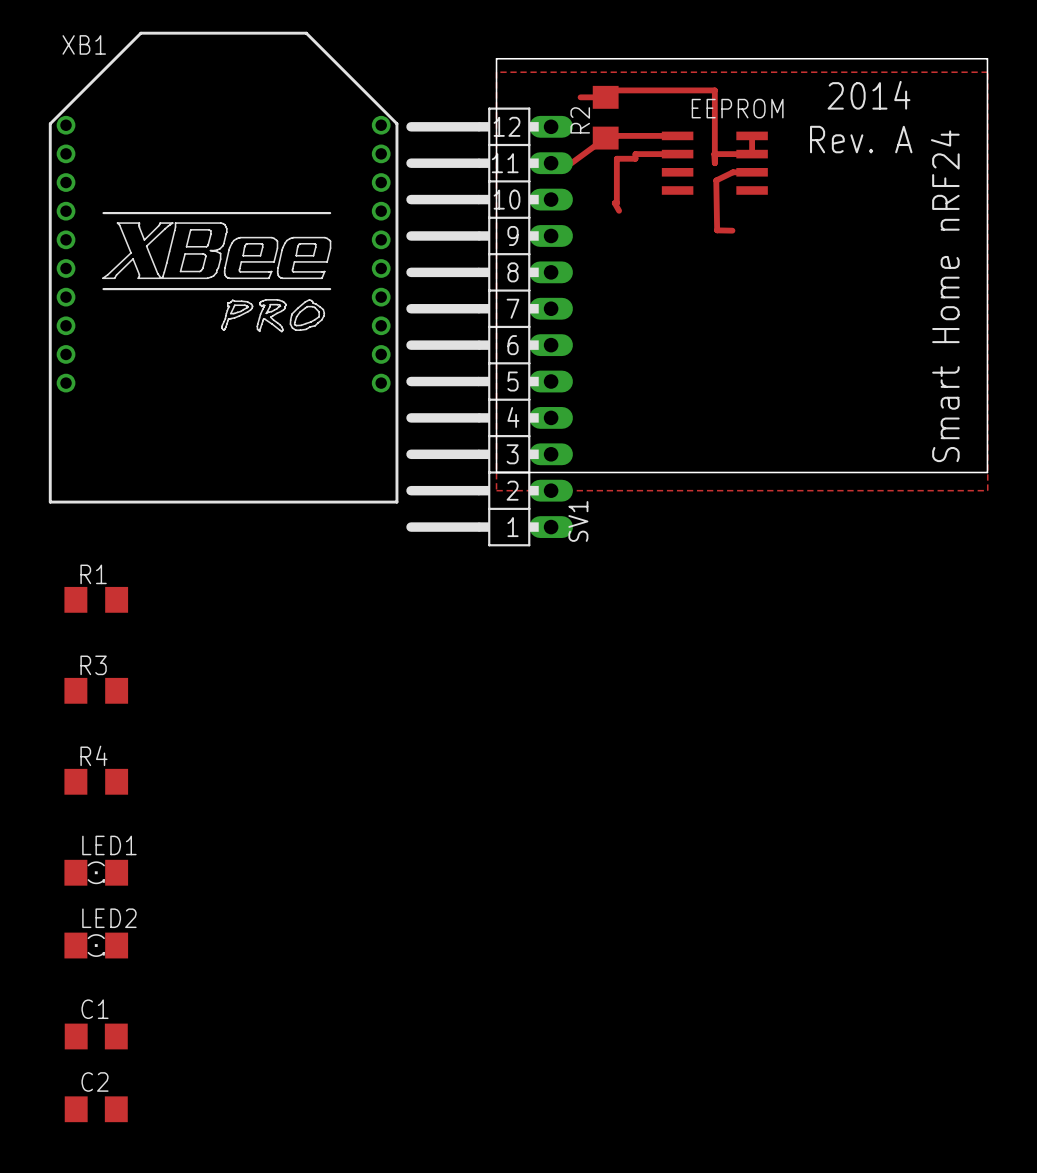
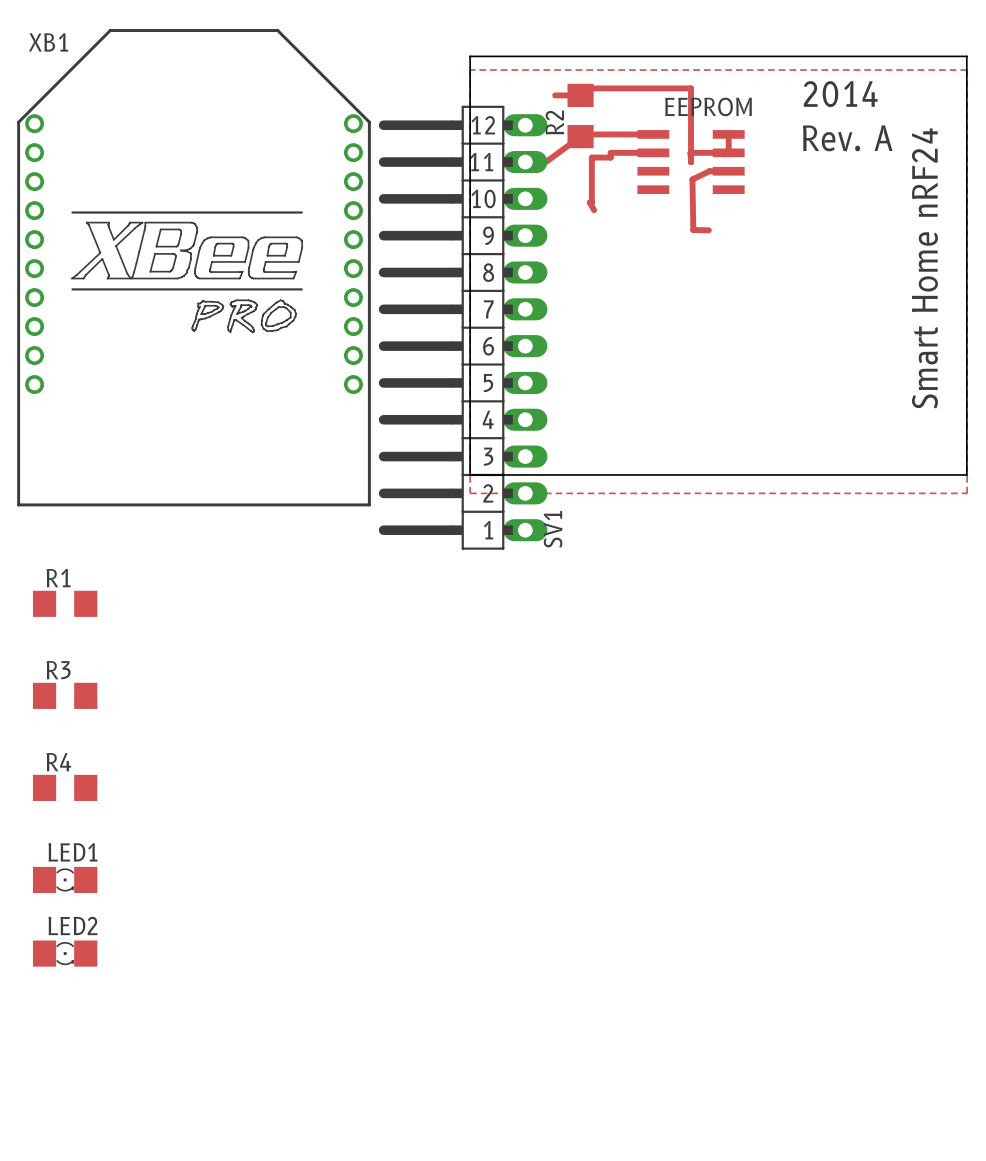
C1: (96, 1036) -> none
C2: (96, 1109) -> none

